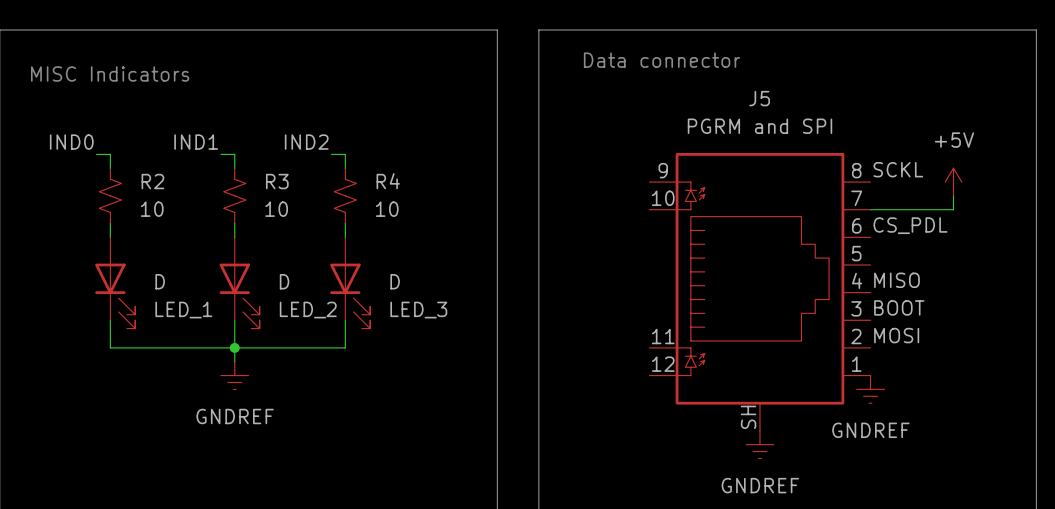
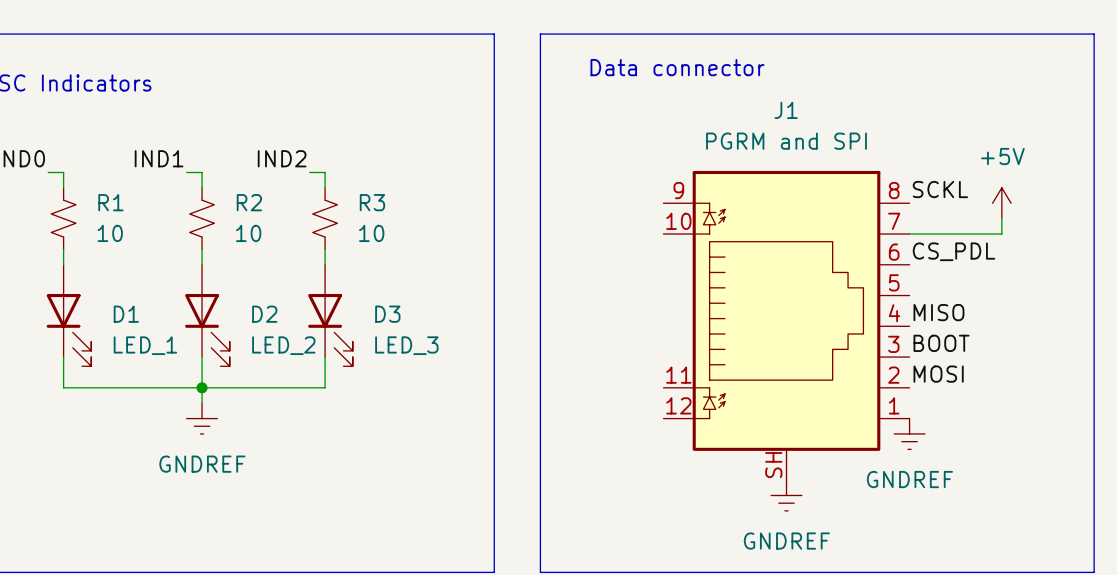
J5 name: J5 (759, 98) -> J1 (786, 110)
R2 name: R2 (152, 181) -> R1 (110, 202)
R3 name: R3 (277, 181) -> R2 (249, 202)
R4 name: R4 (388, 181) -> R3 (372, 202)
D name: D (160, 281) -> D1 (126, 314)
D name: D (284, 281) -> D2 (264, 314)
D name: D (395, 281) -> D3 (387, 314)

